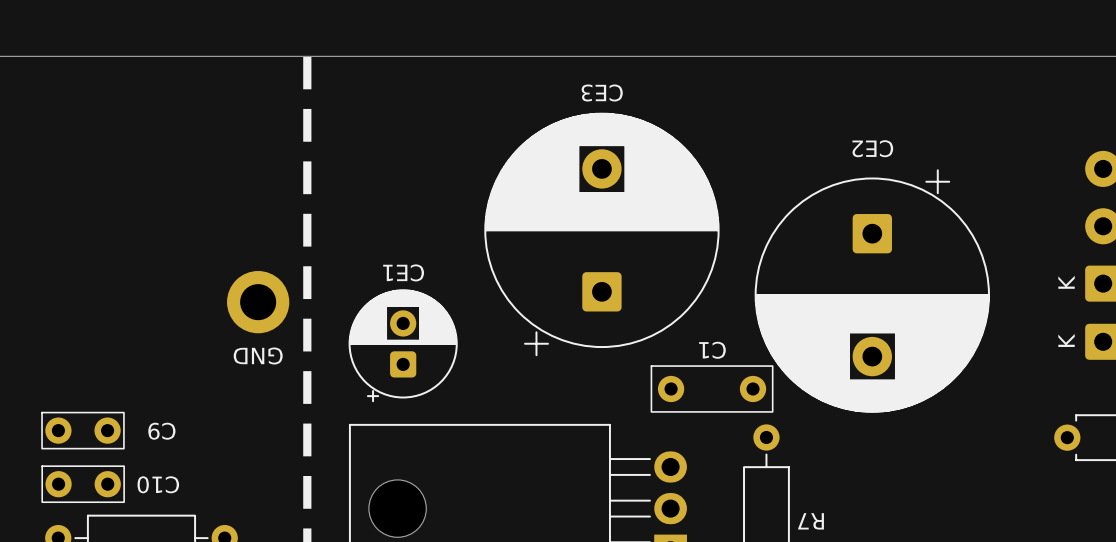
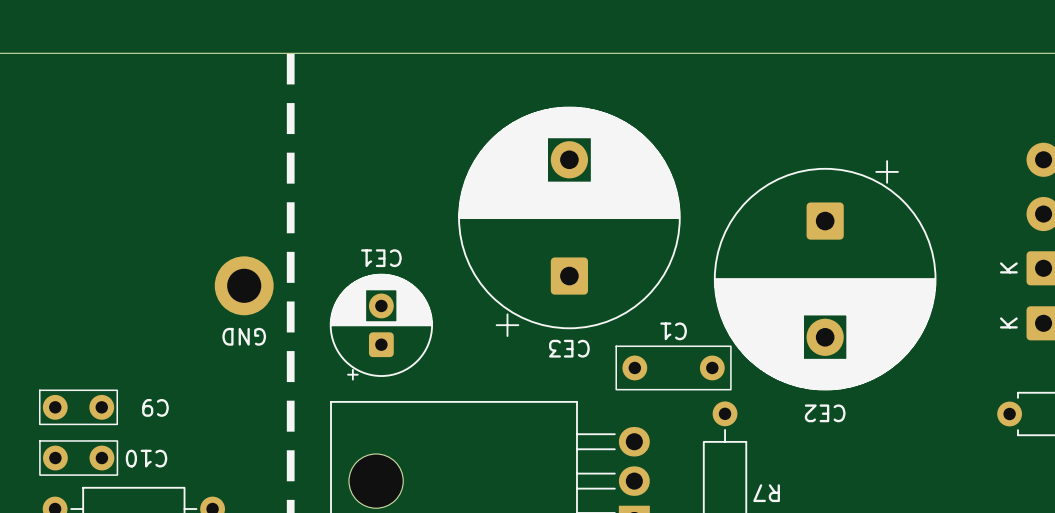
CE3 name position: CE3 (602, 93) -> CE3 (569, 348)
CE2 name position: CE2 (872, 148) -> CE2 (825, 413)

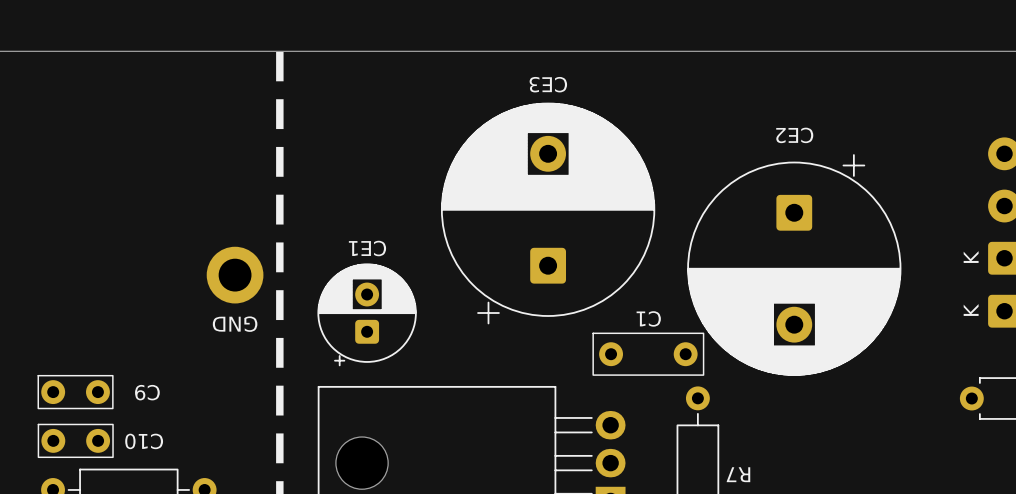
CE3 name position: CE3 (569, 348) -> CE3 (548, 84)
CE2 name position: CE2 (825, 413) -> CE2 (794, 135)

